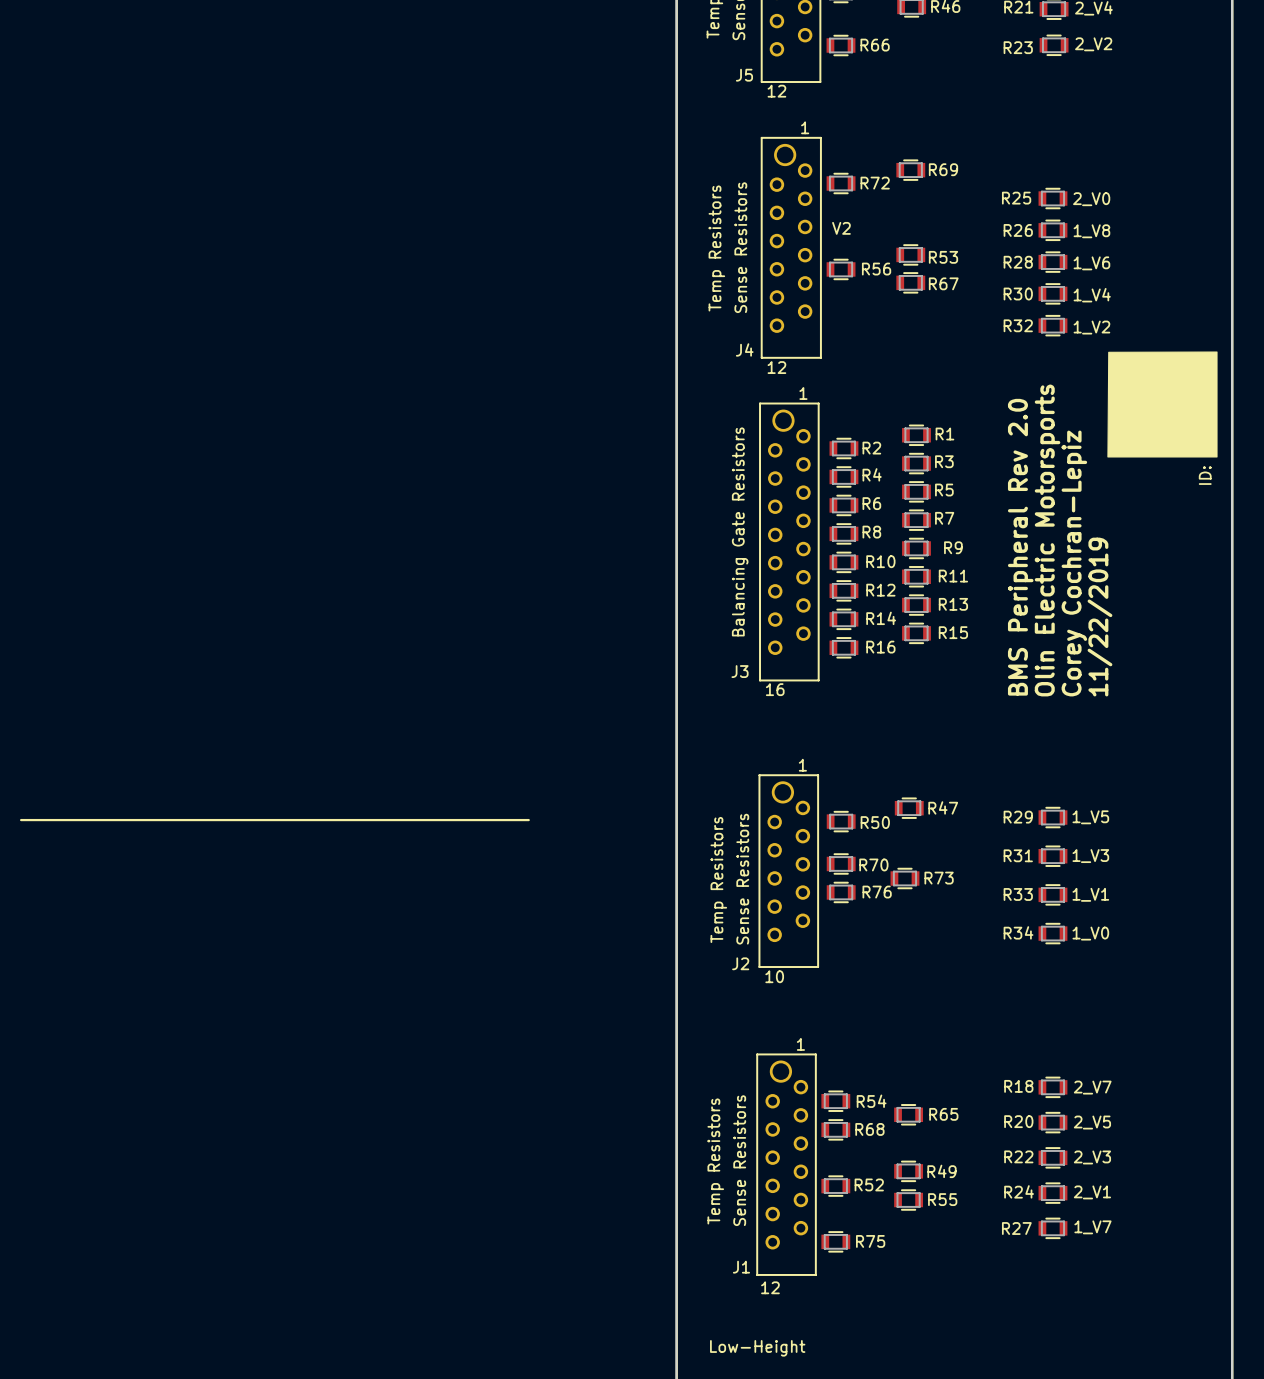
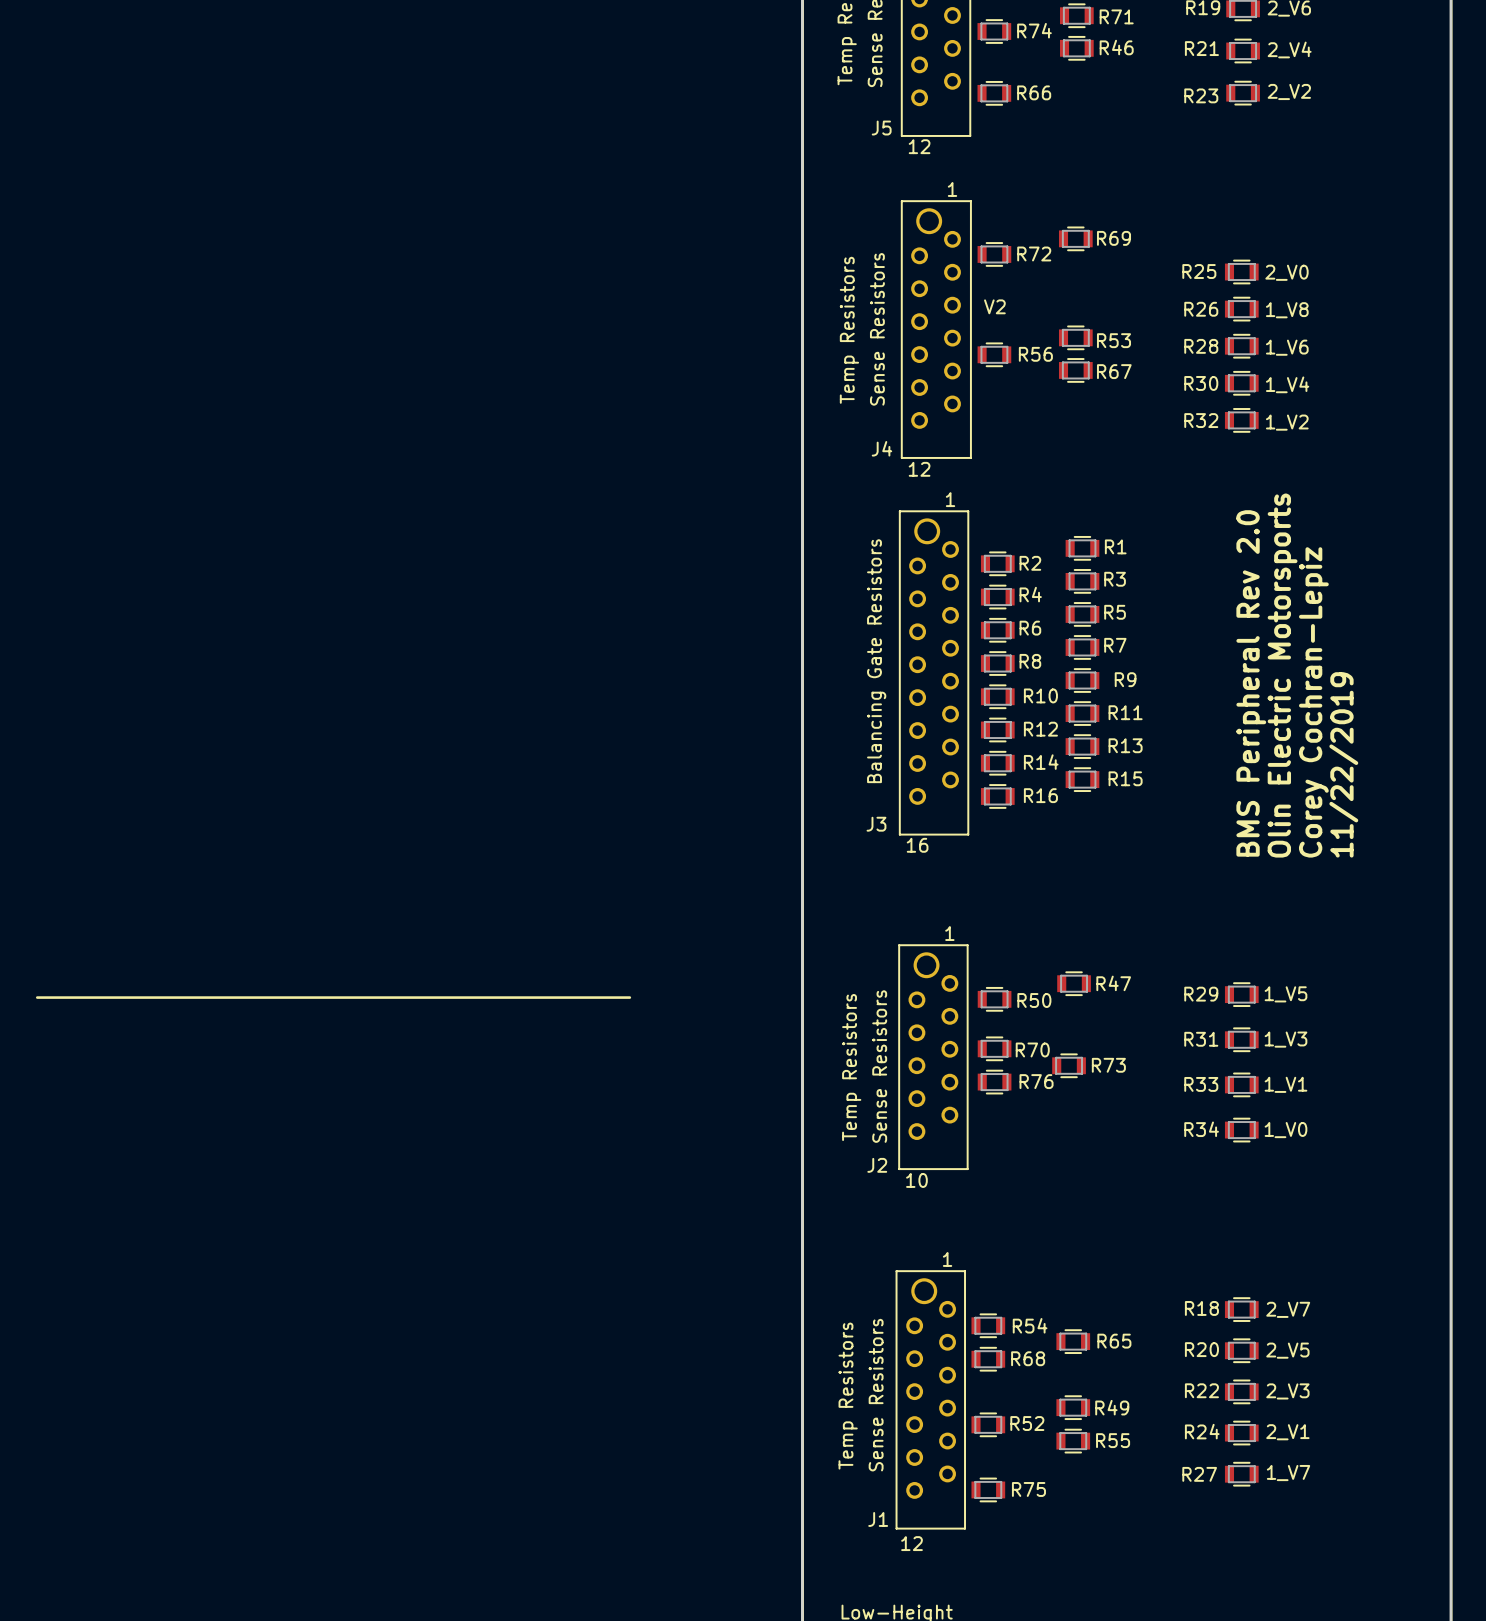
drawing: [1107, 351, 1218, 458] -> none
text: ID: (1205, 475) -> none
text position: Olin Electric Motorsports (1047, 540) -> Olin Electric Motorsports (1282, 675)
text position: BMS Peripheral Rev 2.0 (1020, 547) -> BMS Peripheral Rev 2.0 (1251, 683)
text position: Corey Cochran-Lepiz (1074, 563) -> Corey Cochran-Lepiz (1313, 702)
text position: 11/22/2019 (1099, 617) -> 11/22/2019 (1343, 764)

